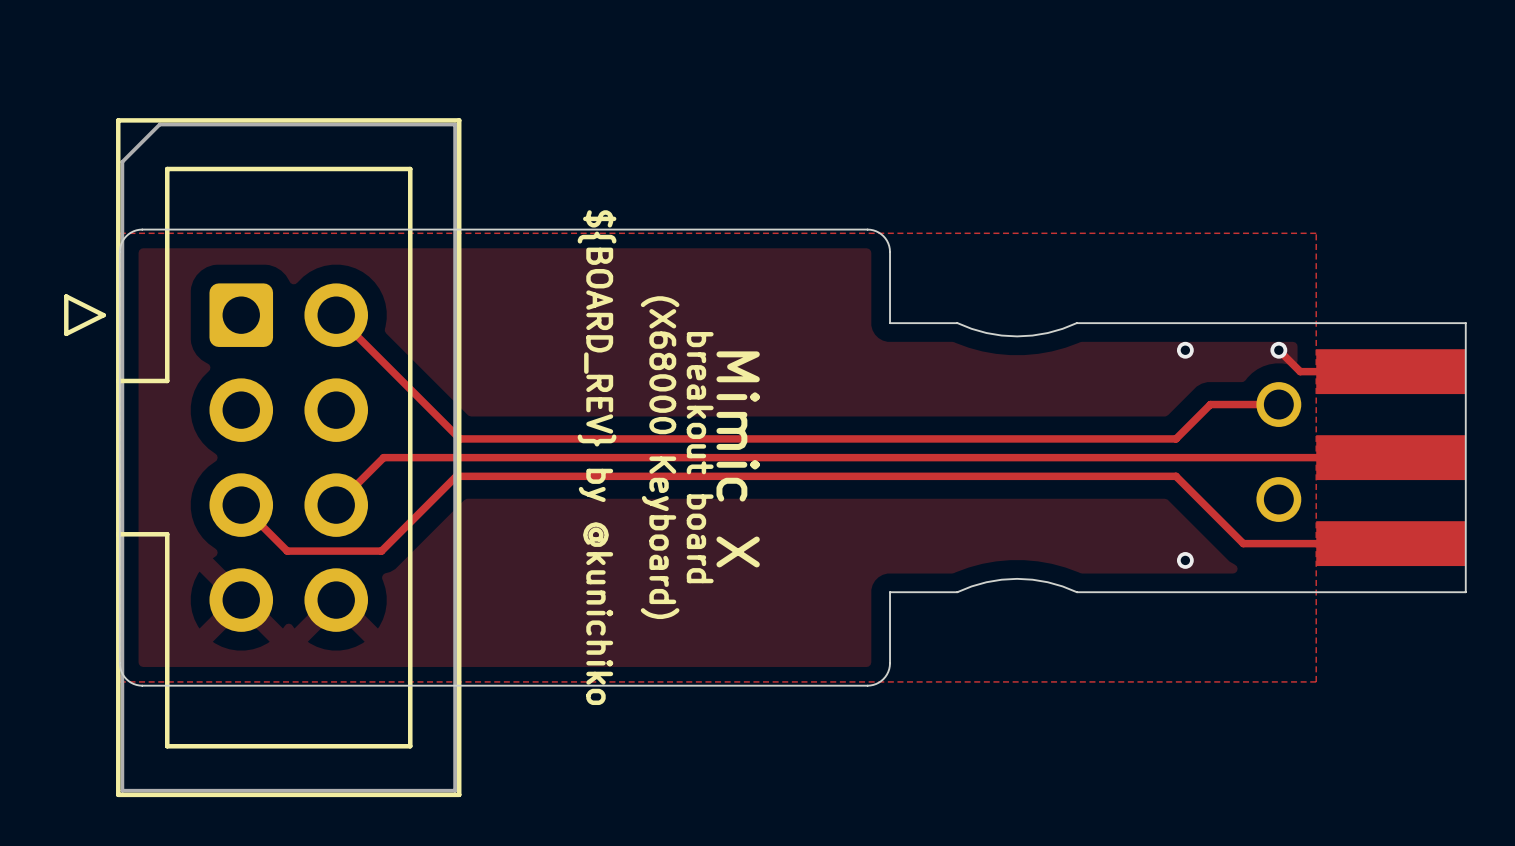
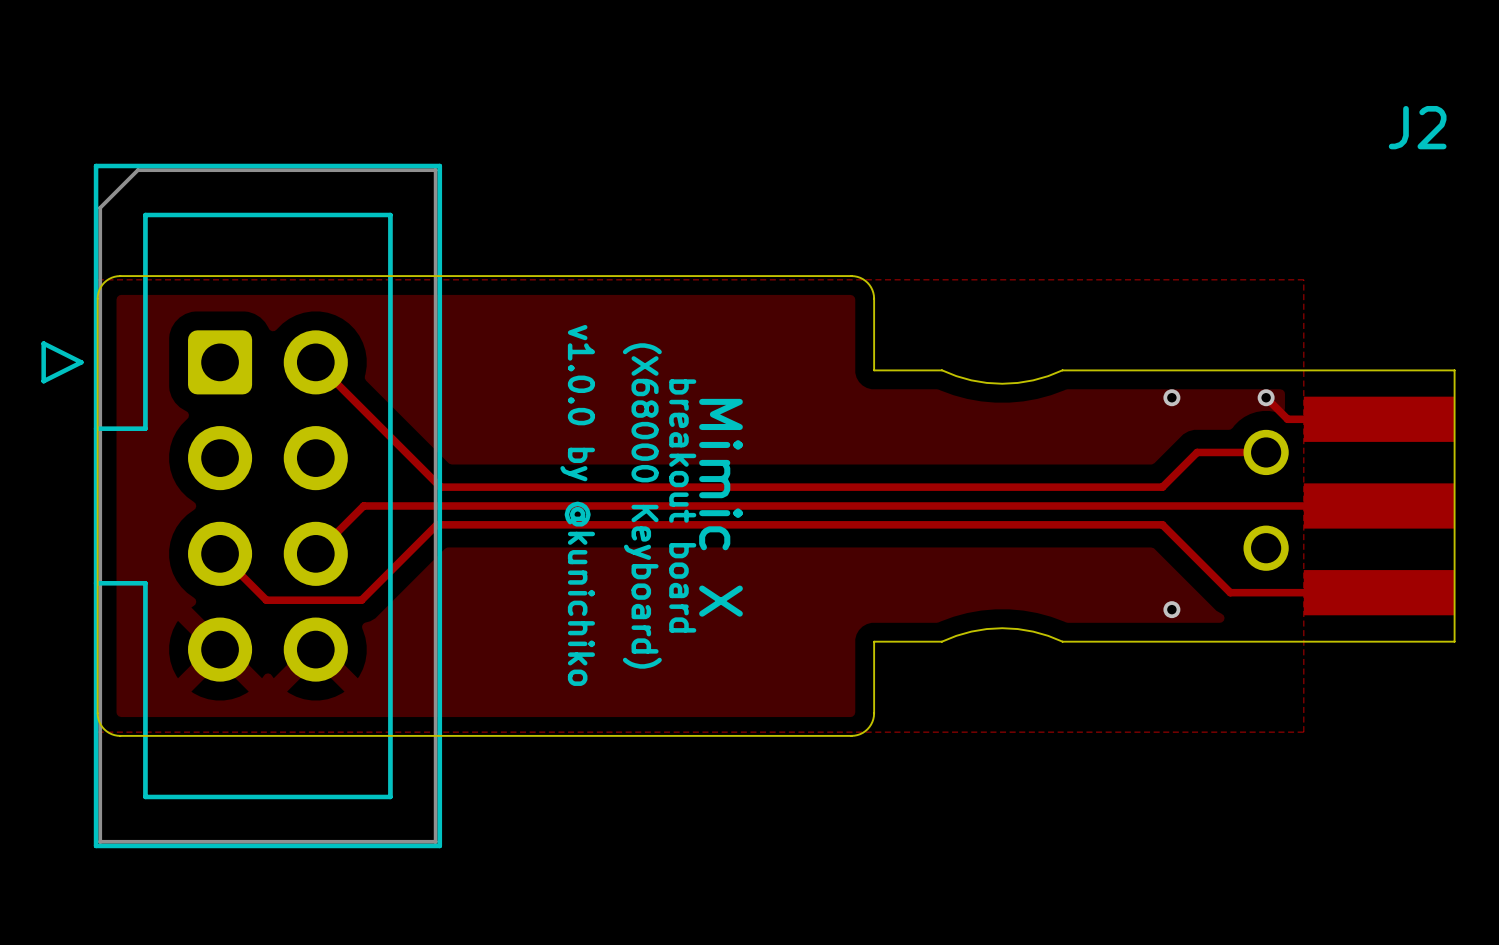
J2 name: none -> J2 (1417, 127)
text: ${BOARD_REV} by @kunichiko (597, 457) -> v1.0.0 by @kunichiko (577, 505)

